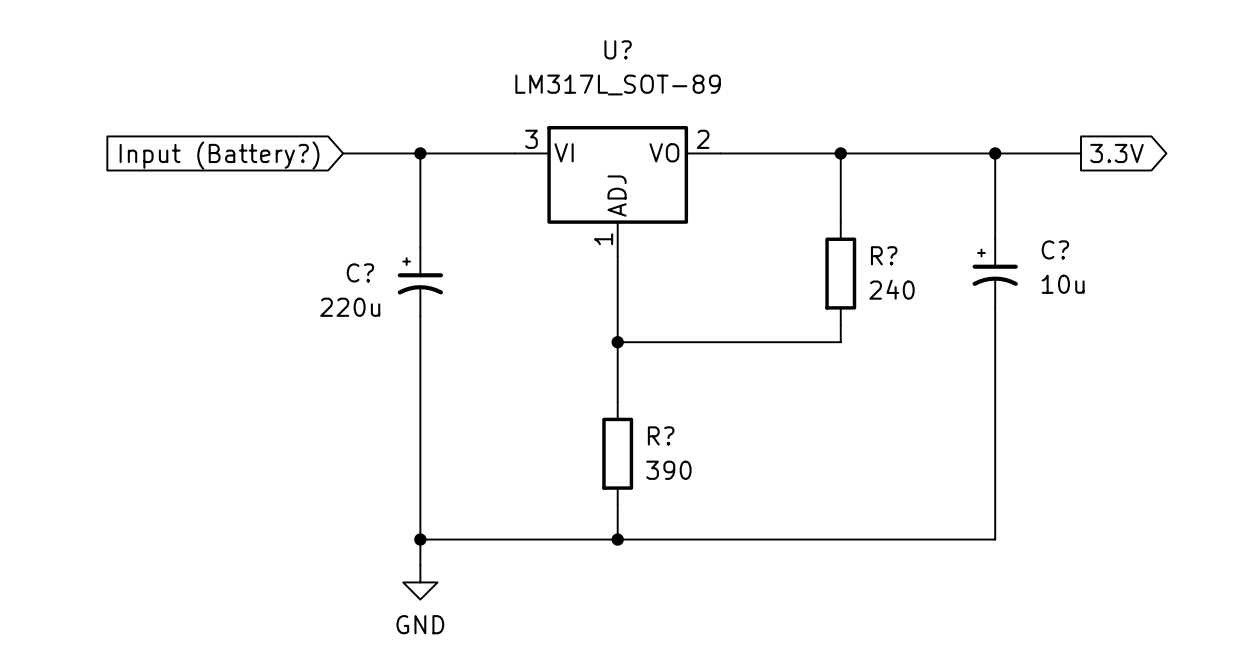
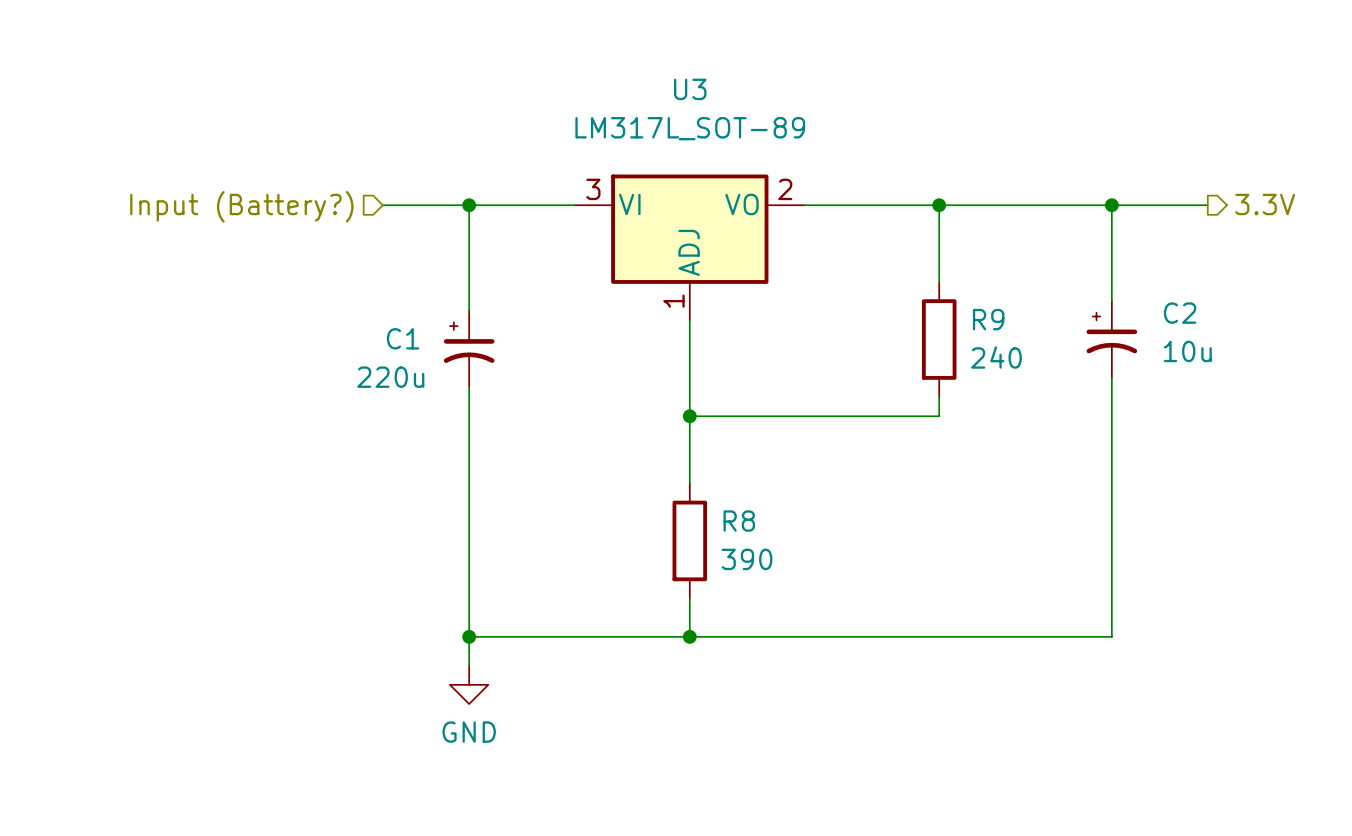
U? name: U? (618, 49) -> U3 (690, 89)
hierarchical label: none -> 3.3V (1265, 204)
global label: 3.3V (1116, 153) -> none
hierarchical label: none -> Input (Battery?) (241, 206)
global label: Input (Battery?) (219, 155) -> none
C? name: C? (1055, 249) -> C2 (1180, 313)
R? name: R? (884, 255) -> R9 (988, 319)
C? name: C? (360, 272) -> C1 (403, 338)
R? name: R? (661, 435) -> R8 (739, 521)

